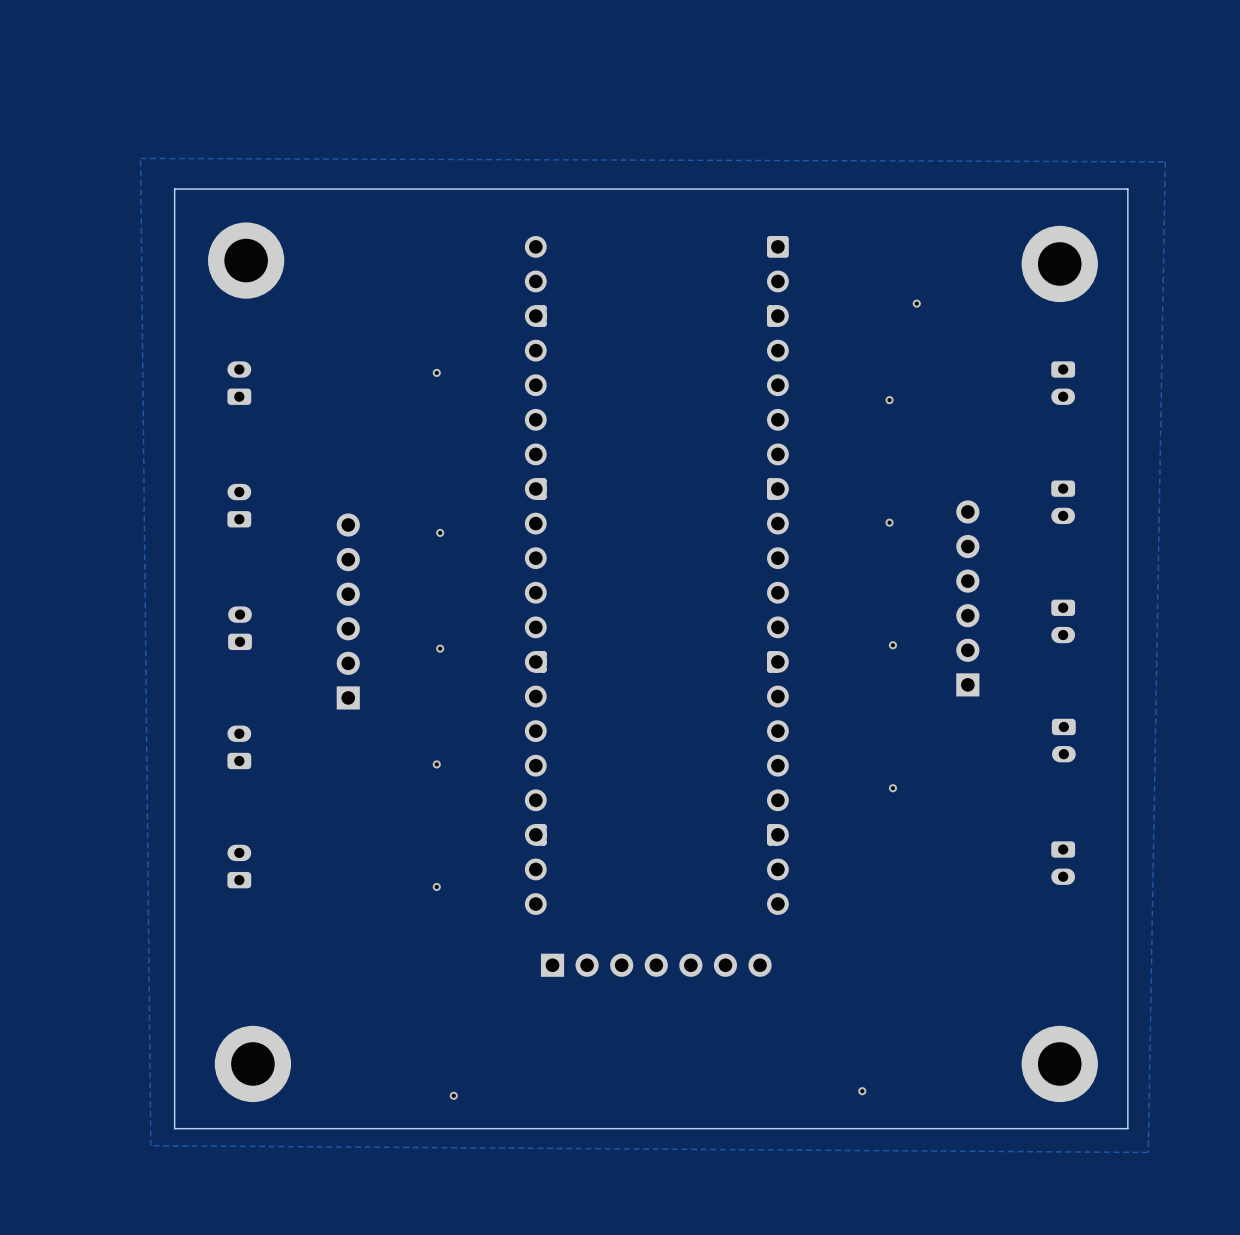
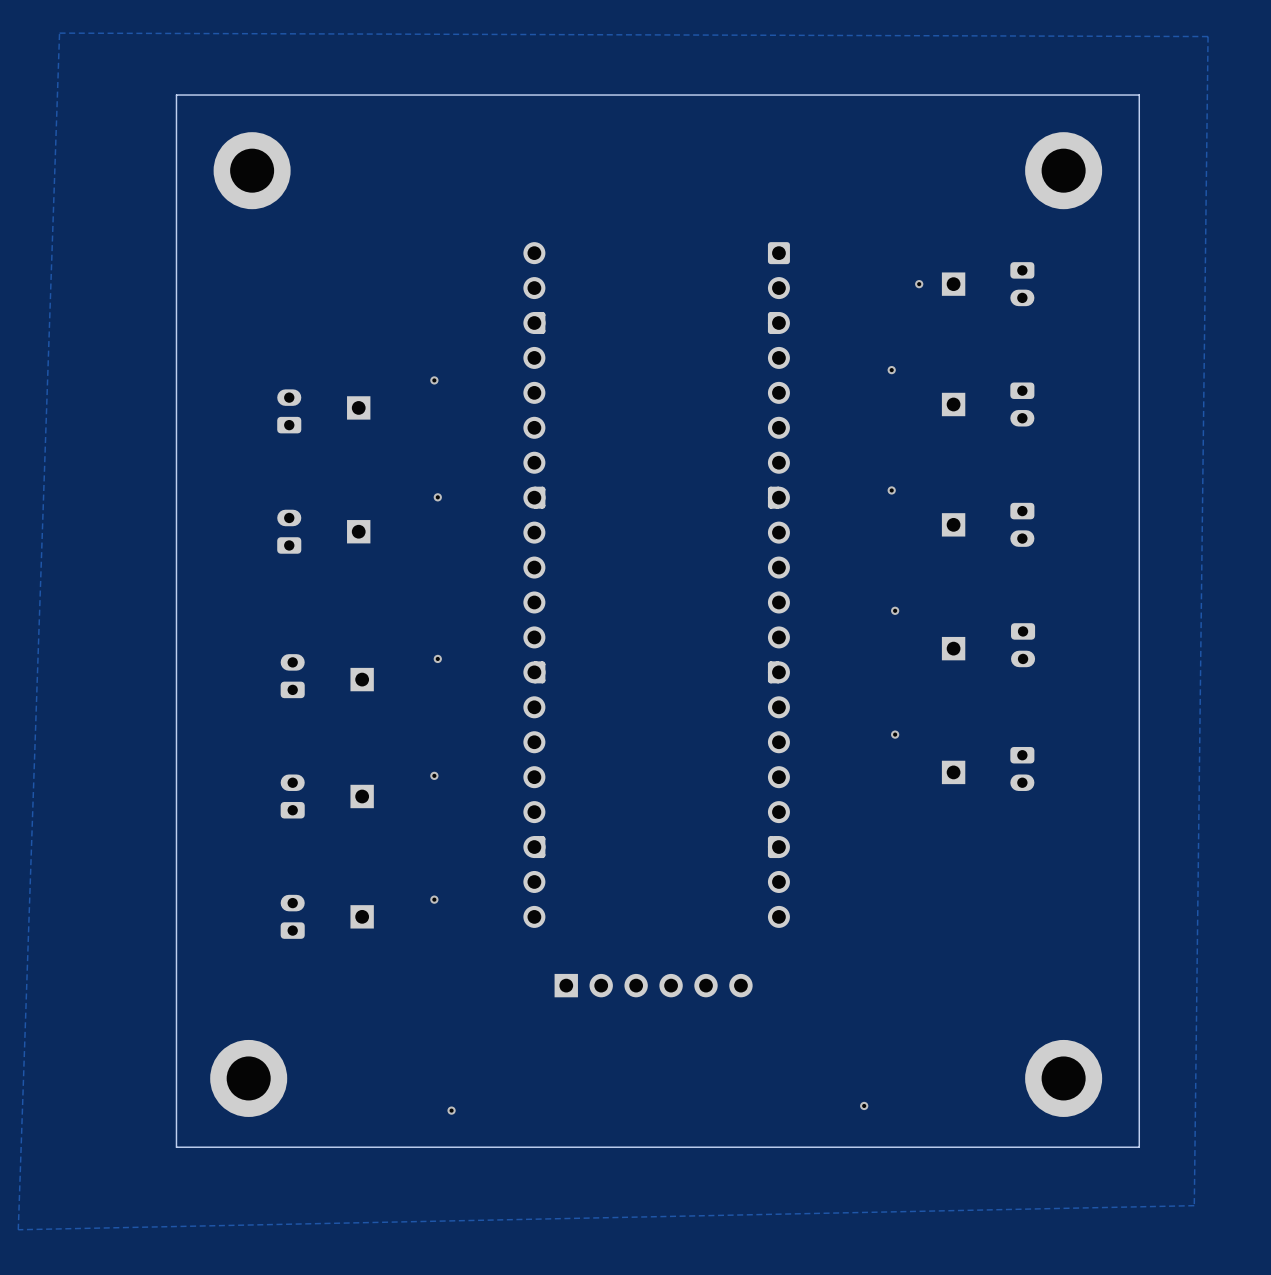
zone outline: (140, 158) (150, 1145) (1148, 1152) (1165, 161) (140, 158) -> (59, 33) (1208, 36) (1194, 1205) (18, 1229) (59, 33)
board edge: (1127, 189) (174, 189) (174, 1128) (1127, 1128) (1127, 189) -> (1139, 95) (1139, 1147) (176, 1147) (176, 95) (1139, 95)
part position: (246, 260) -> (252, 170)
part position: (1059, 263) -> (1063, 170)
part: none -> (953, 284)
part: none -> (1022, 284)
via position: (916, 303) -> (919, 284)
via: none -> (891, 370)
part position: (239, 383) -> (289, 411)
part position: (1063, 383) -> (1022, 404)
part: none -> (953, 404)
part: none -> (358, 407)
via: (889, 400) -> none
via: none -> (891, 490)
part position: (1063, 502) -> (1022, 524)
part position: (239, 505) -> (289, 531)
part: none -> (953, 524)
part: none -> (358, 531)
via: (889, 522) -> none
via position: (440, 532) -> (437, 497)
part: (967, 598) -> none
via: none -> (895, 610)
part: (348, 611) -> none
part position: (1063, 621) -> (1023, 645)
part: (240, 628) -> none
part: none -> (953, 648)
via: (892, 645) -> none
part: none -> (292, 676)
part: none -> (362, 679)
via: none -> (895, 734)
part position: (1063, 740) -> (1022, 768)
part: (239, 747) -> none
part: none -> (953, 772)
part: none -> (292, 796)
part: none -> (362, 796)
via: (892, 788) -> none
part: (1063, 863) -> none
part: (239, 866) -> none
part: none -> (292, 916)
part: none -> (362, 916)
part footprint: [540, 953, 772, 977] -> [554, 973, 753, 998]

